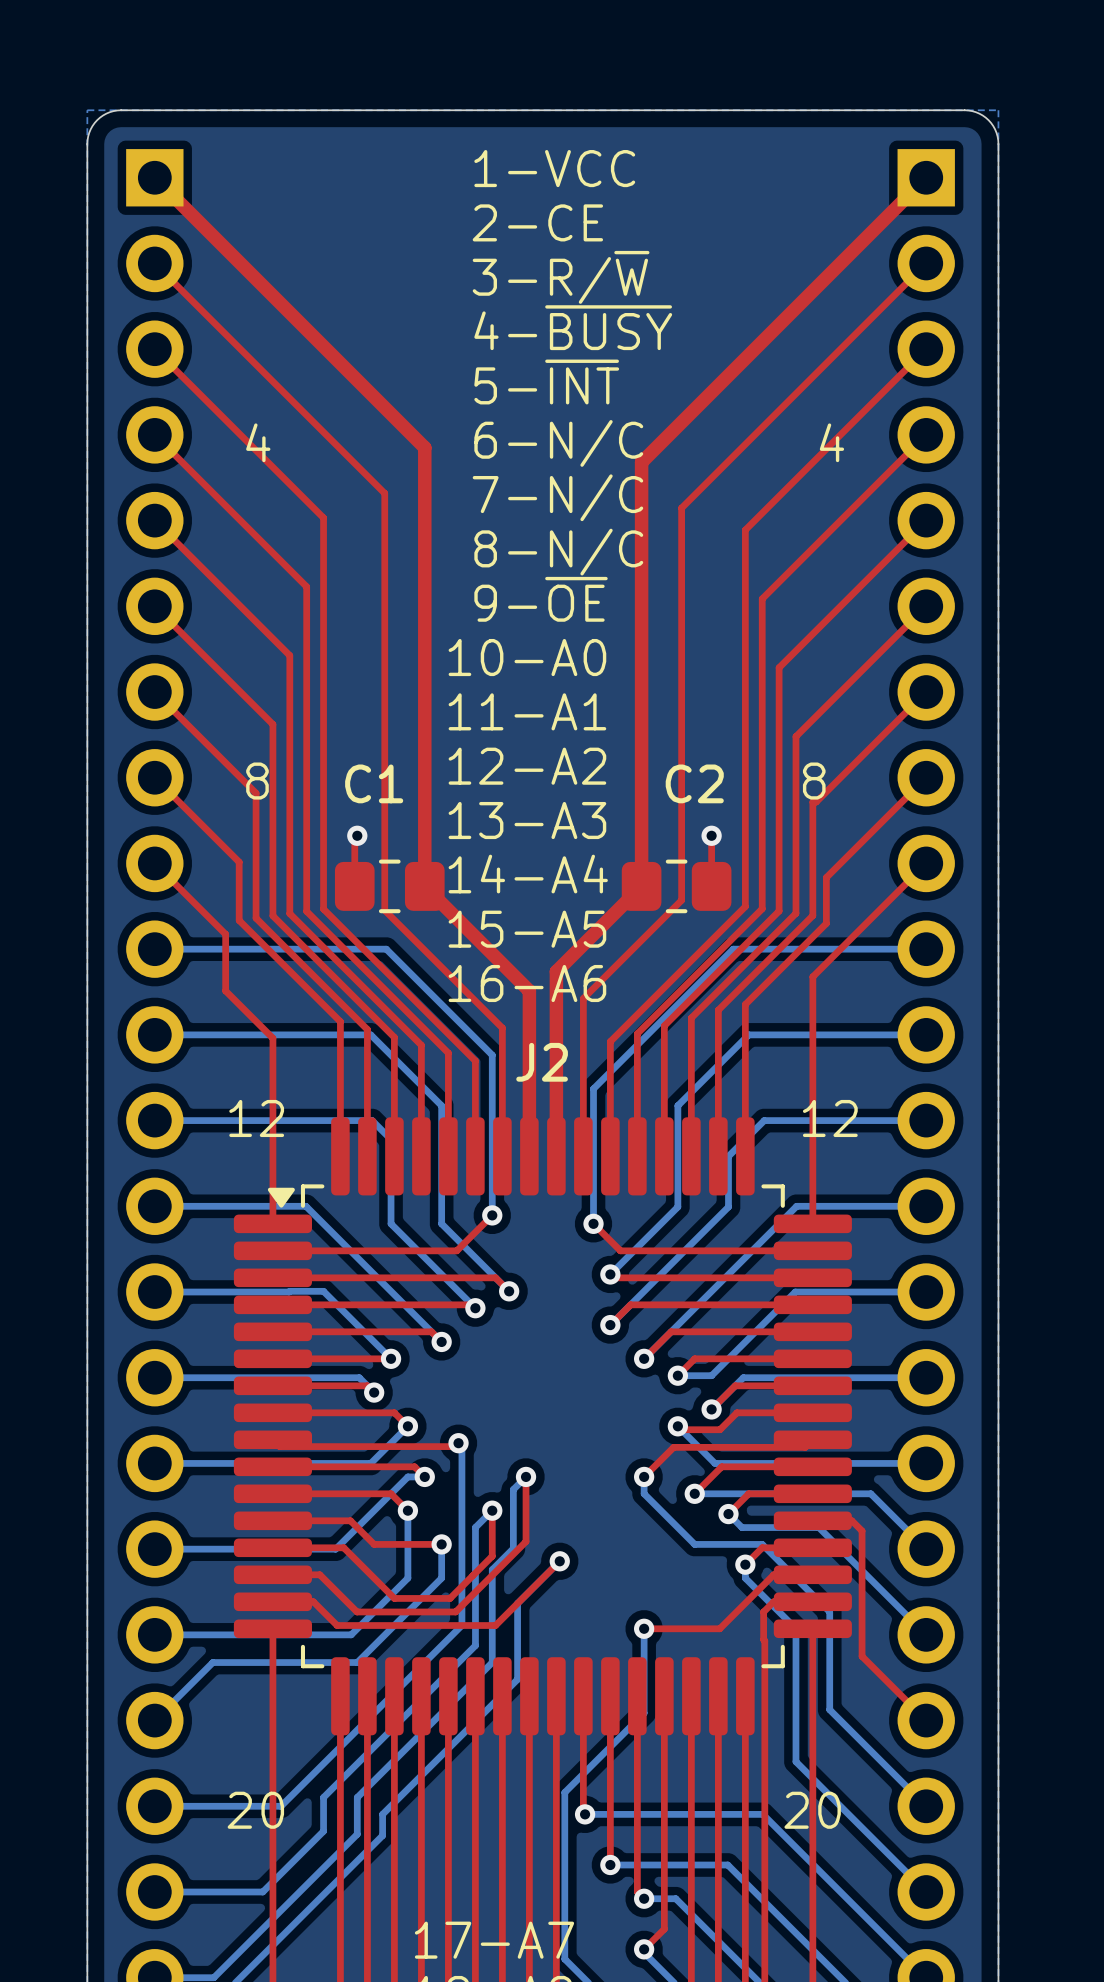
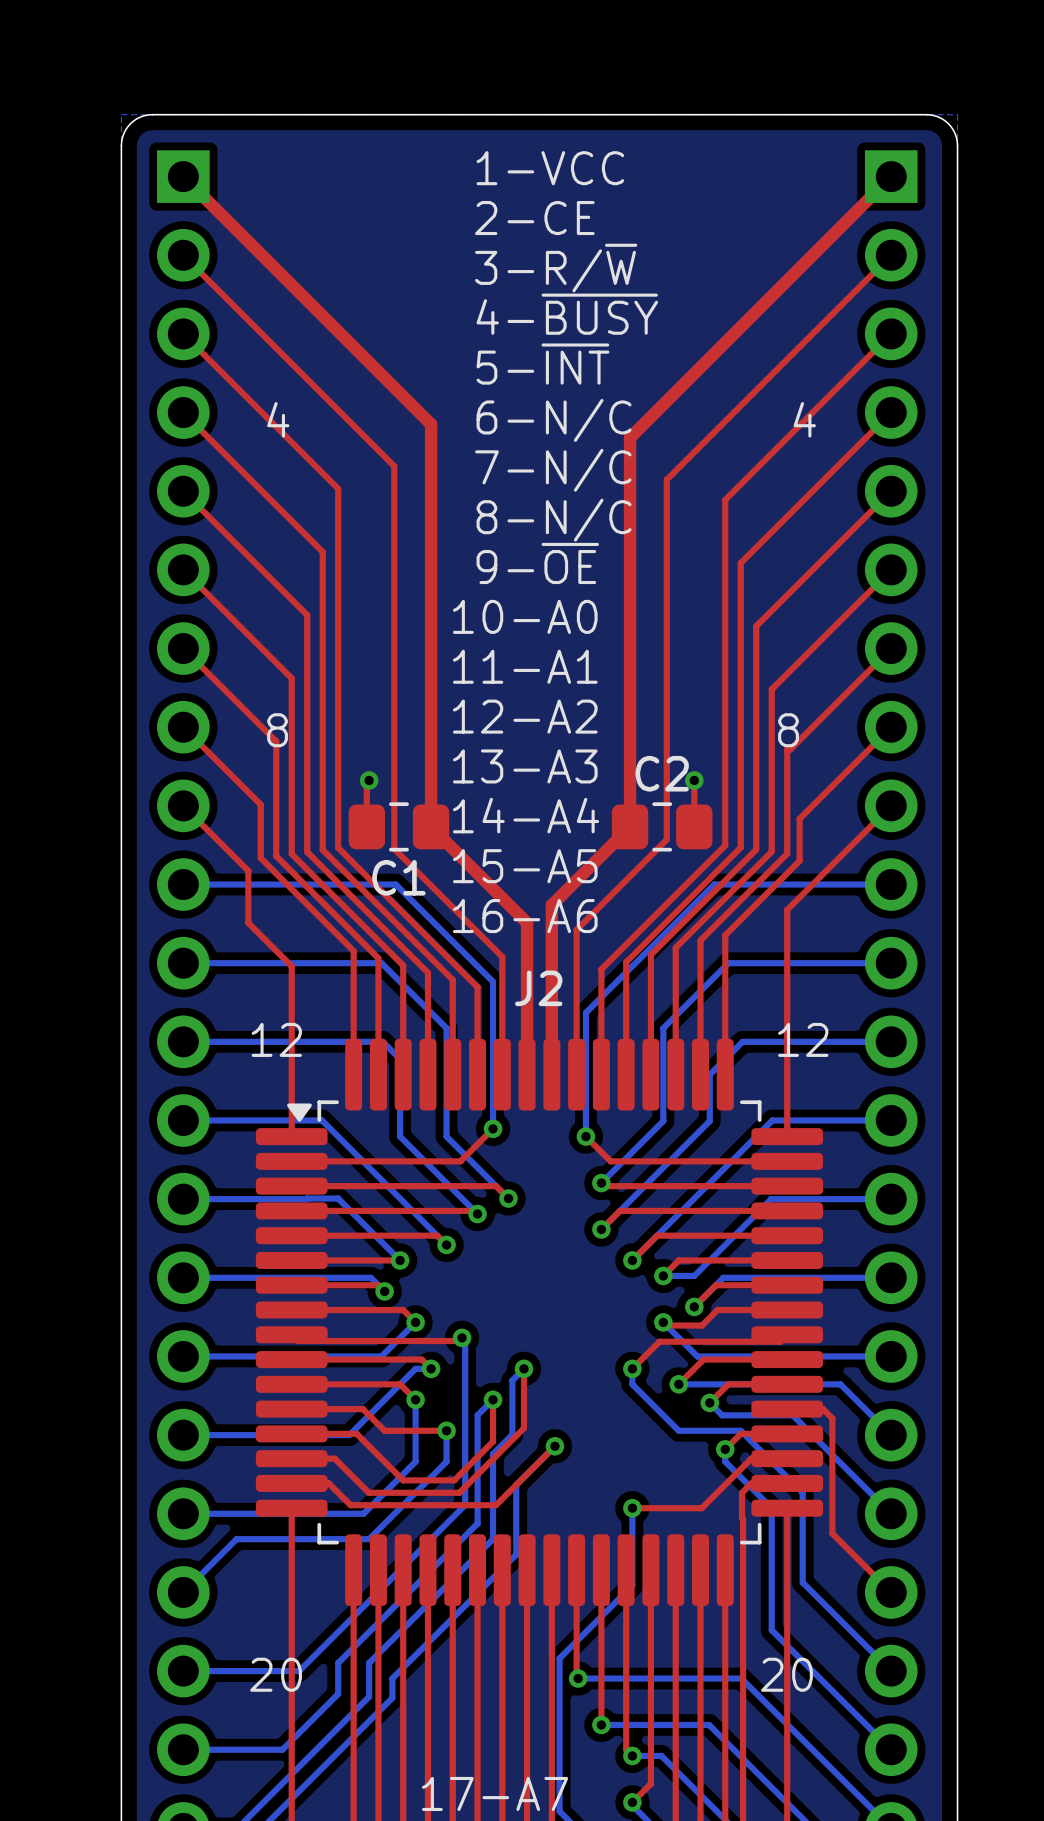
C1 name position: C1 (374, 783) -> C1 (398, 877)
C2 name position: C2 (694, 783) -> C2 (662, 773)

